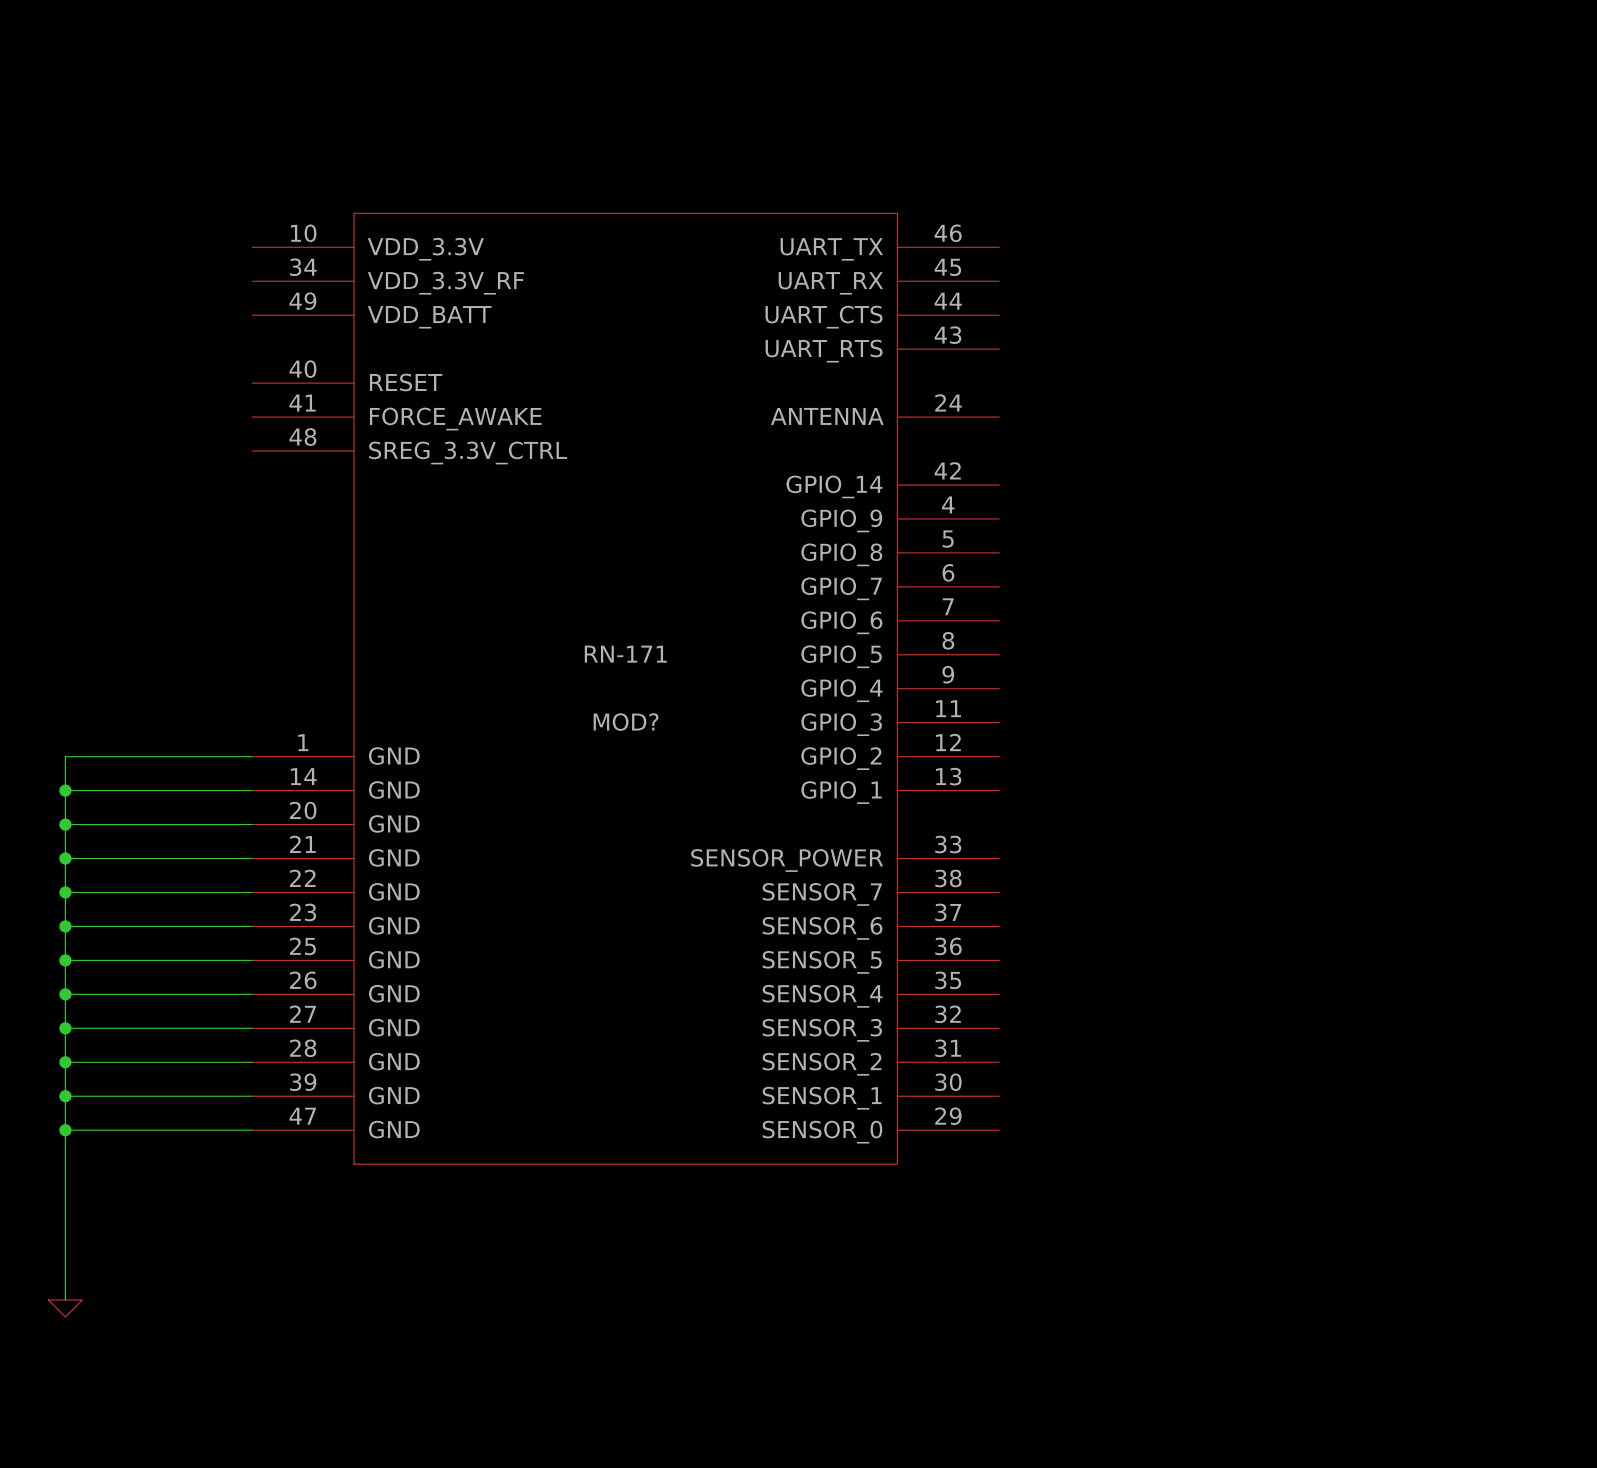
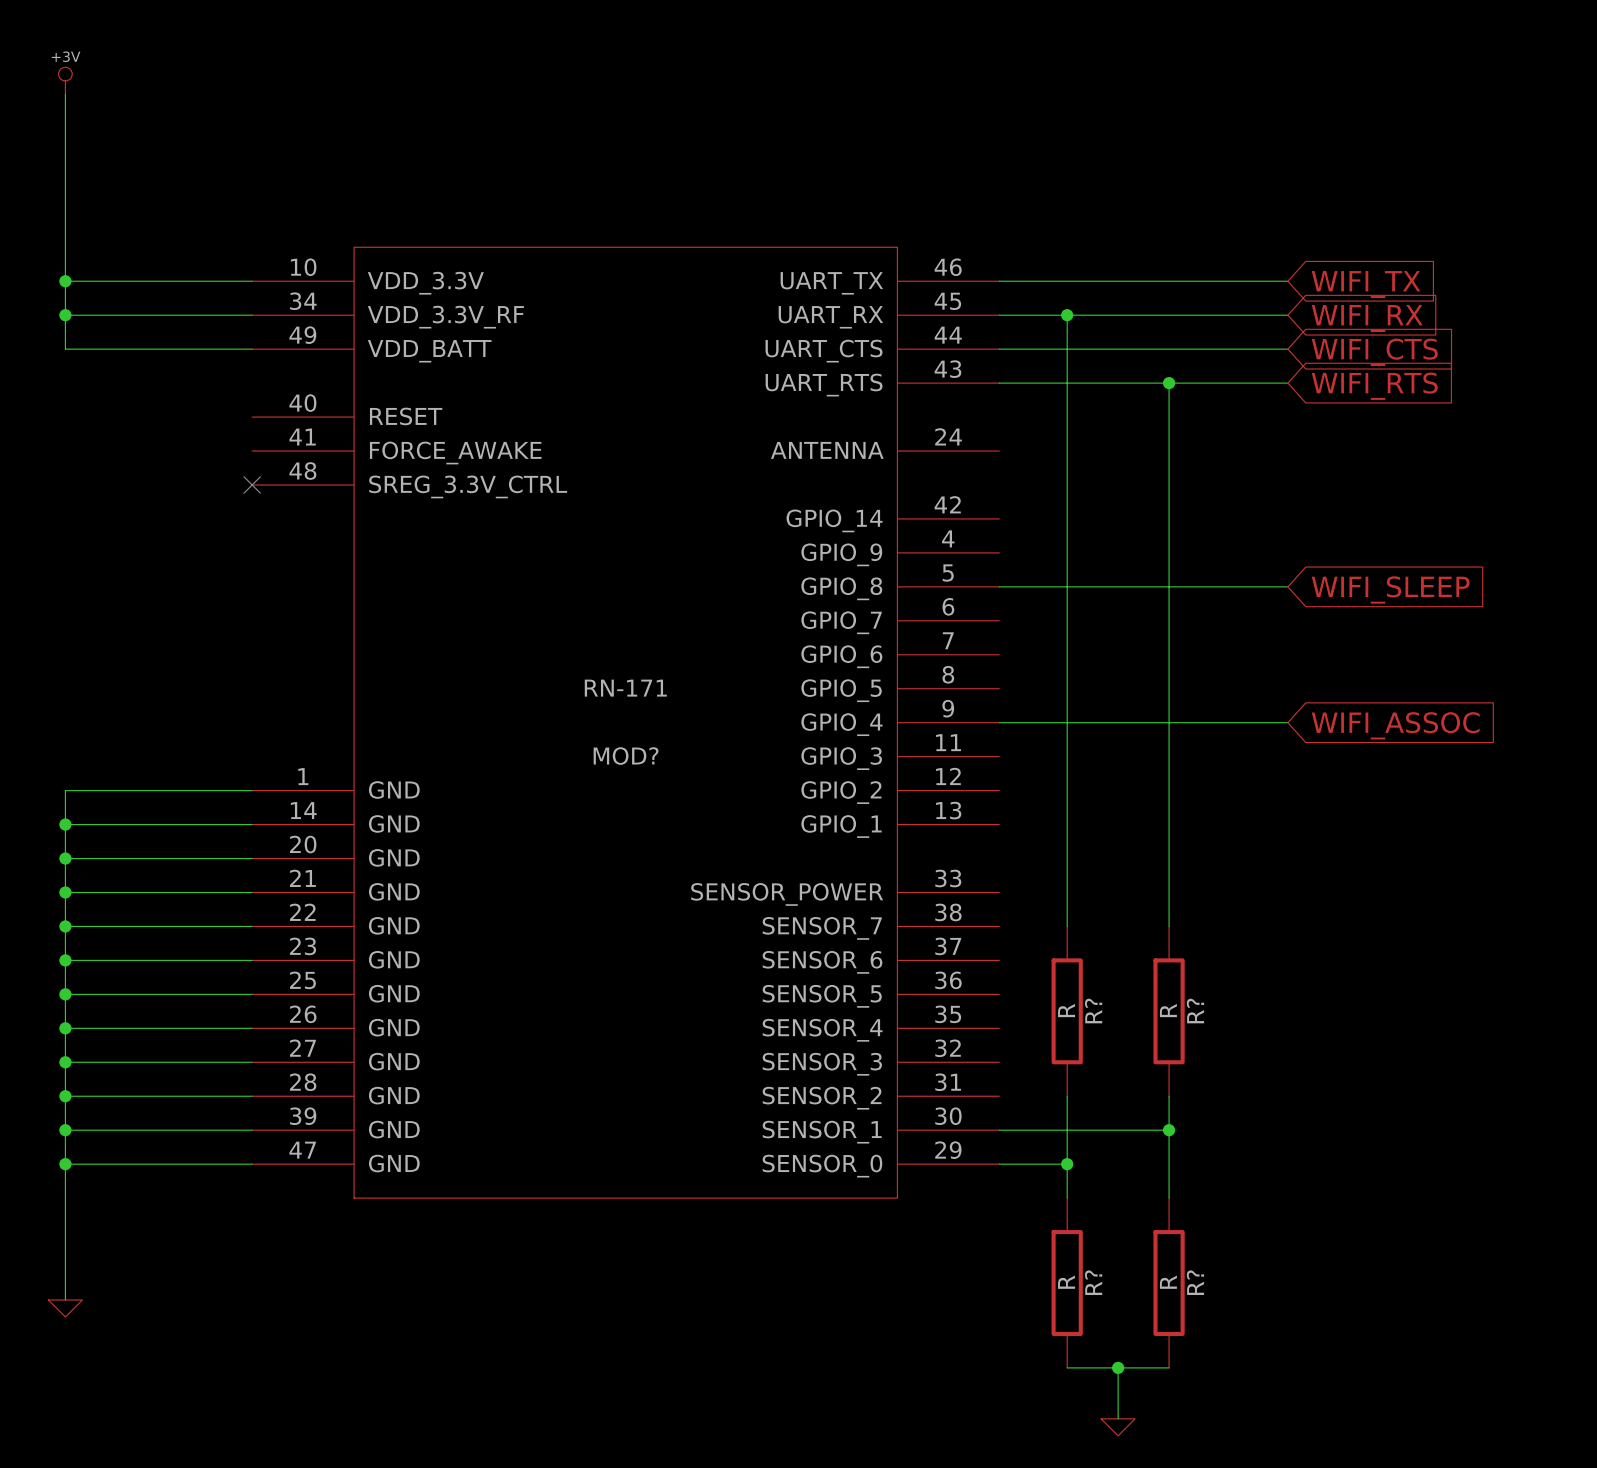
power symbol: none -> +3V (65, 80)
wire: none -> (65, 94) (65, 349) (252, 349)
wire: none -> (65, 281) (252, 281)
junction: none -> (65, 281)
wire: none -> (999, 281) (1287, 281)
global label: none -> WIFI_TX (1366, 284)
wire: none -> (65, 315) (252, 315)
junction: none -> (65, 315)
wire: none -> (999, 315) (1287, 315)
wire: none -> (1067, 315) (1067, 926)
junction: none -> (1067, 315)
global label: none -> WIFI_RX (1367, 318)
wire: none -> (999, 349) (1287, 349)
global label: none -> WIFI_CTS (1374, 352)
wire: none -> (999, 383) (1287, 383)
wire: none -> (1169, 383) (1169, 926)
junction: none -> (1169, 383)
global label: none -> WIFI_RTS (1374, 386)
no-connect mark: none -> (252, 484)
wire: none -> (999, 586) (1287, 586)
global label: none -> WIFI_SLEEP (1390, 589)
MOD? position: (625, 688) -> (625, 722)
wire: none -> (999, 722) (1287, 722)
global label: none -> WIFI_ASSOC (1395, 725)
wire: (252, 756) (65, 756) (65, 790) -> none
junction: (65, 790) -> none
R?: none -> R (1067, 1011)
R?: none -> R (1169, 1011)
wire: none -> (1067, 1096) (1067, 1198)
wire: none -> (1169, 1096) (1169, 1198)
wire: none -> (999, 1130) (1169, 1130)
junction: none -> (1169, 1130)
wire: none -> (65, 1164) (252, 1164)
junction: none -> (65, 1164)
wire: none -> (999, 1164) (1067, 1164)
junction: none -> (1067, 1164)
R?: none -> R (1067, 1283)
R?: none -> R (1169, 1283)
wire: none -> (1067, 1367) (1169, 1367)
wire: none -> (1118, 1367) (1118, 1418)
junction: none -> (1118, 1367)
power symbol: none -> (1118, 1427)

